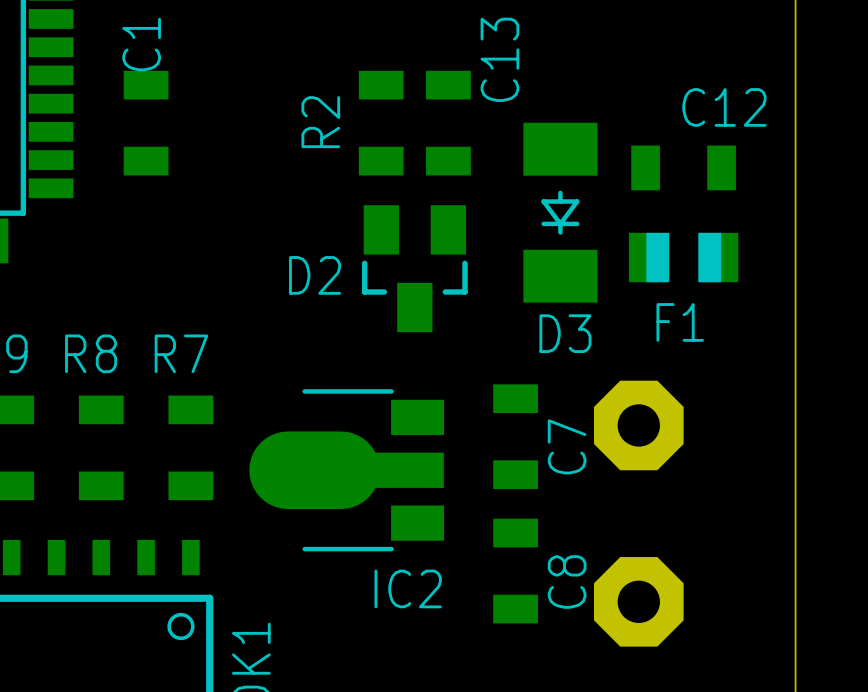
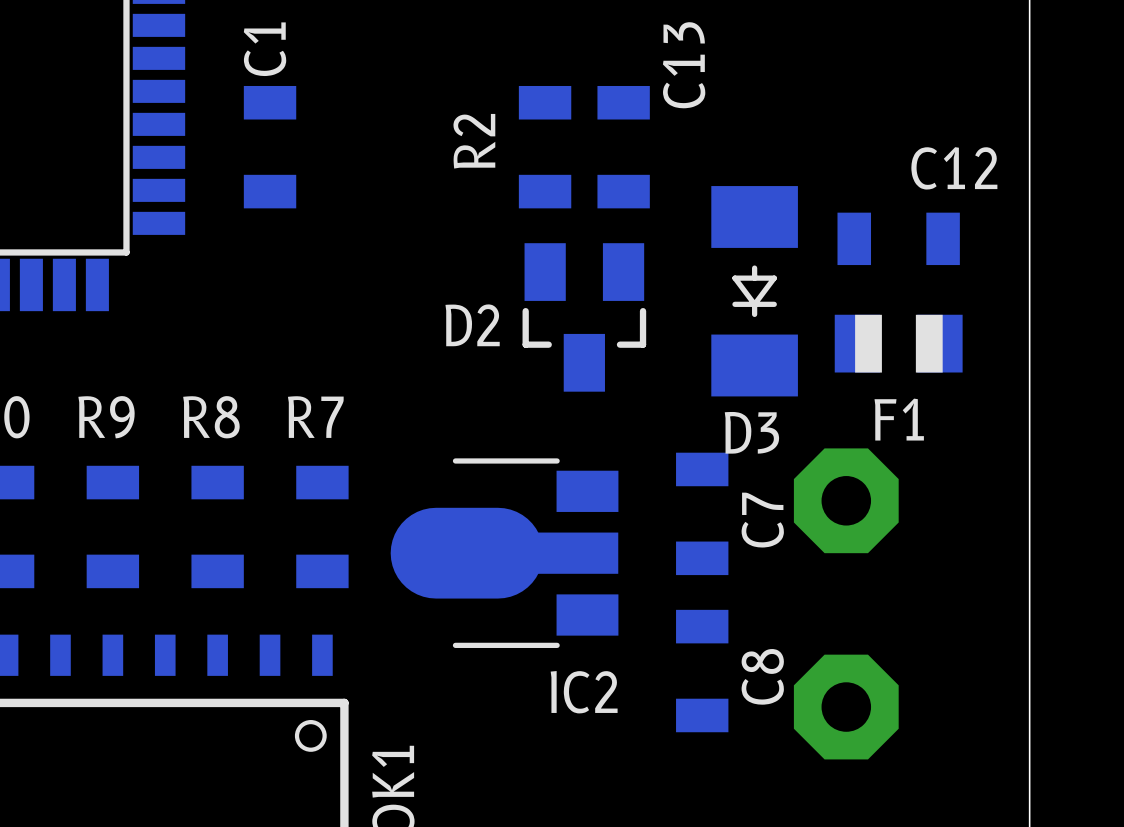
C12 position: (683, 167) -> (898, 238)
D3 position: (560, 212) -> (754, 291)
F1 position: (683, 257) -> (898, 343)

